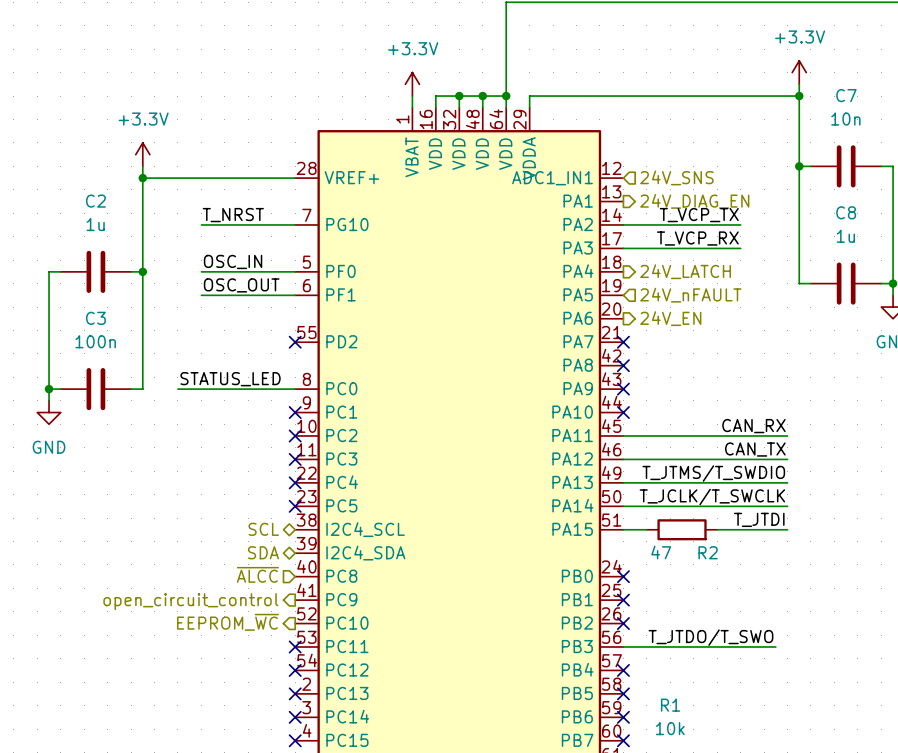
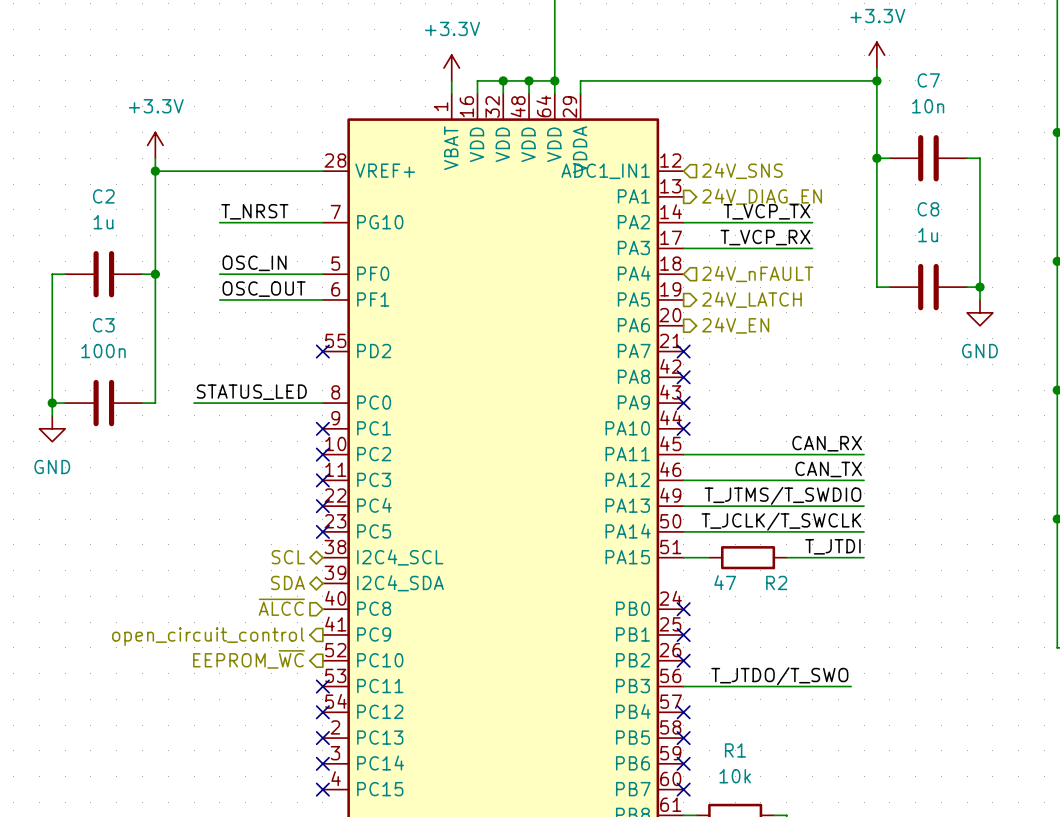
hierarchical label shape: output (685, 271) -> input (757, 274)
hierarchical label: 24V_LATCH (685, 271) -> 24V_nFAULT (757, 274)
hierarchical label shape: input (690, 295) -> output (751, 299)
hierarchical label: 24V_nFAULT (690, 295) -> 24V_LATCH (751, 299)

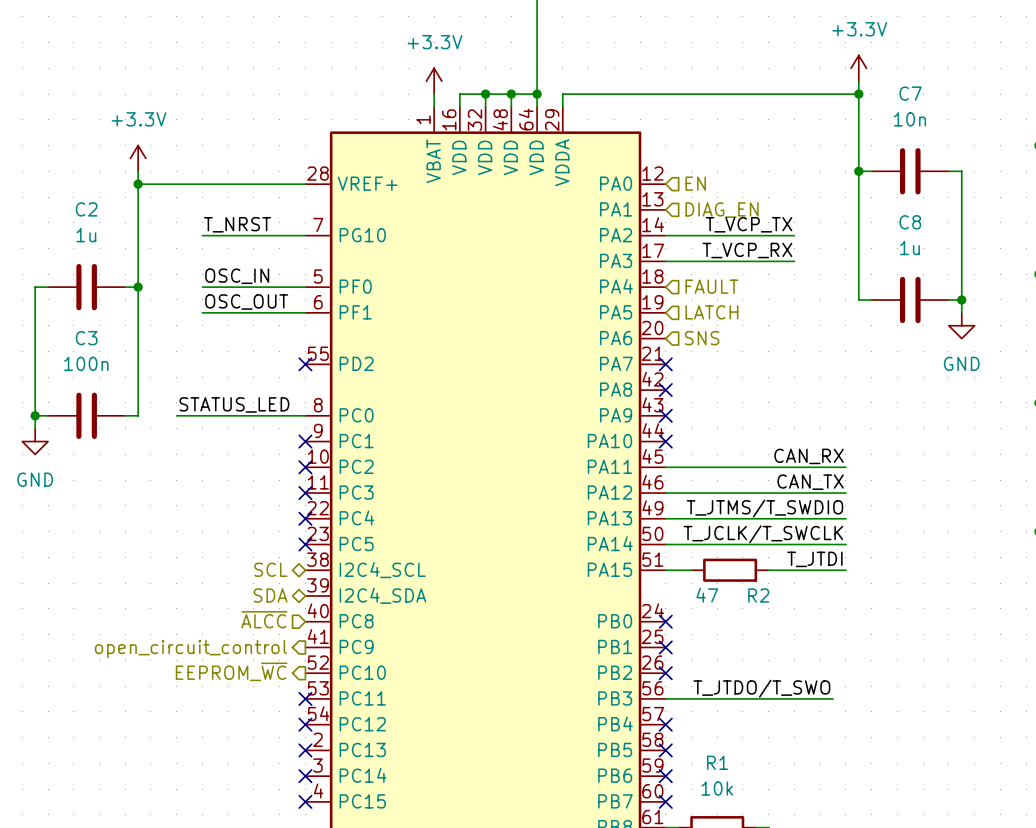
hierarchical label: 24V_SNS (742, 170) -> EN (695, 183)
part pin name: ADC1_IN1 (605, 171) -> PA0 (616, 183)
hierarchical label shape: output (762, 196) -> input (722, 210)
hierarchical label: 24V_DIAG_EN (762, 196) -> DIAG_EN (722, 210)
hierarchical label: 24V_nFAULT (757, 274) -> FAULT (711, 286)
hierarchical label shape: output (751, 299) -> input (711, 312)
hierarchical label: 24V_LATCH (751, 299) -> LATCH (711, 312)
hierarchical label shape: output (735, 325) -> input (702, 338)
hierarchical label: 24V_EN (735, 325) -> SNS (702, 338)

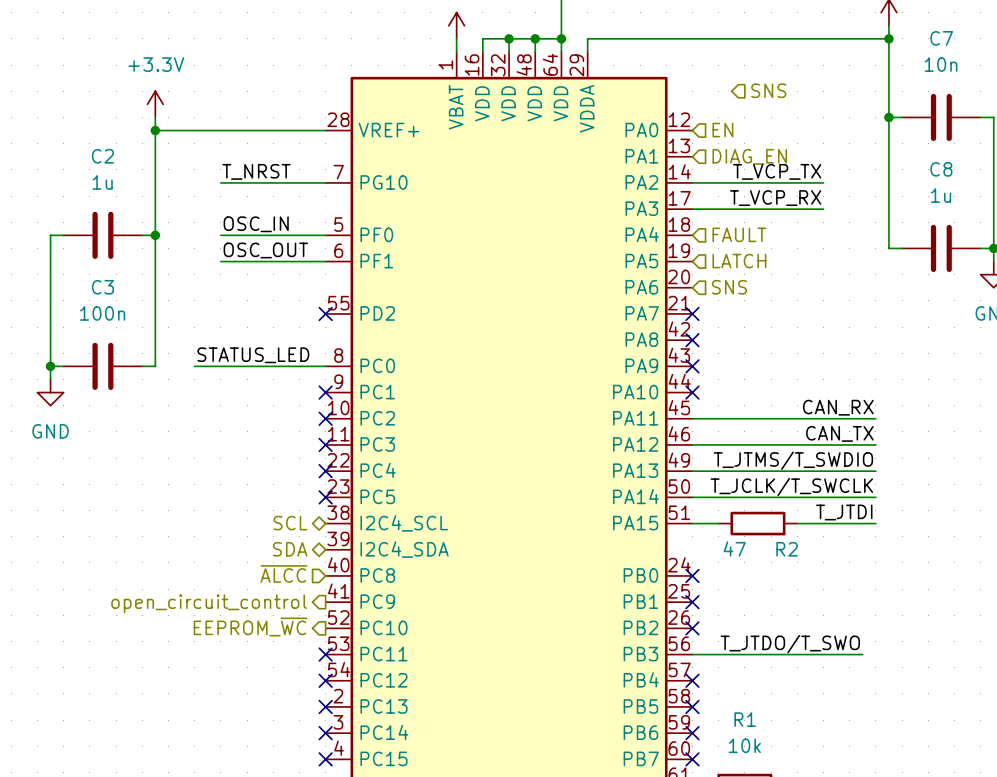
hierarchical label: none -> SNS (768, 90)

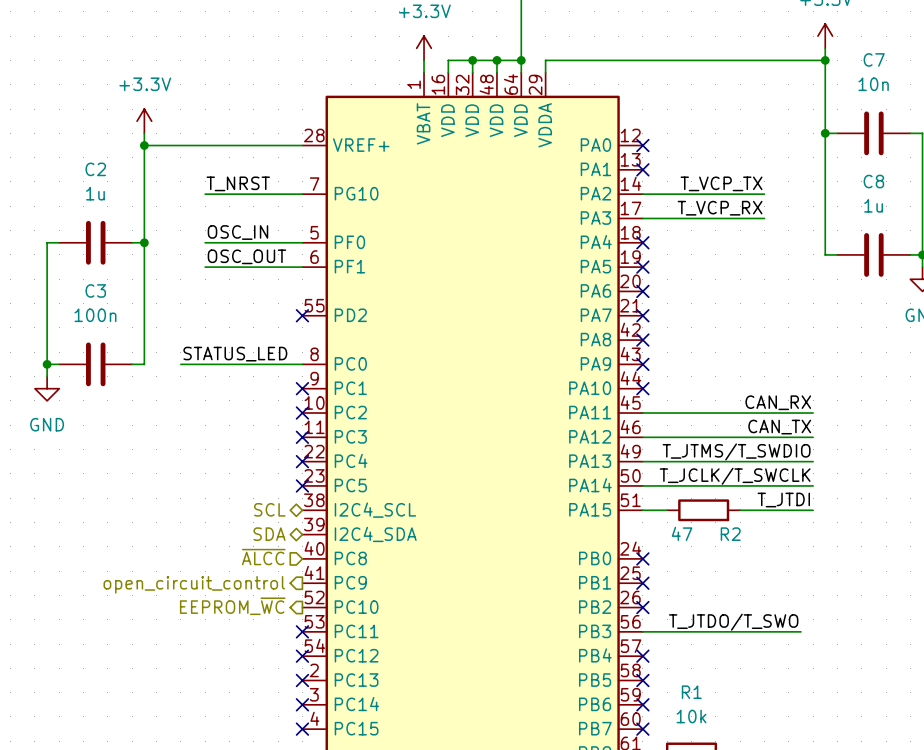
hierarchical label: SNS (768, 90) -> none
no-connect mark: none -> (642, 145)
hierarchical label: EN (722, 130) -> none
no-connect mark: none -> (642, 169)
hierarchical label: DIAG_EN (749, 156) -> none
hierarchical label: FAULT (739, 234) -> none
no-connect mark: none -> (642, 242)
no-connect mark: none -> (642, 267)
hierarchical label: LATCH (739, 261) -> none
no-connect mark: none -> (642, 291)
hierarchical label: SNS (729, 287) -> none

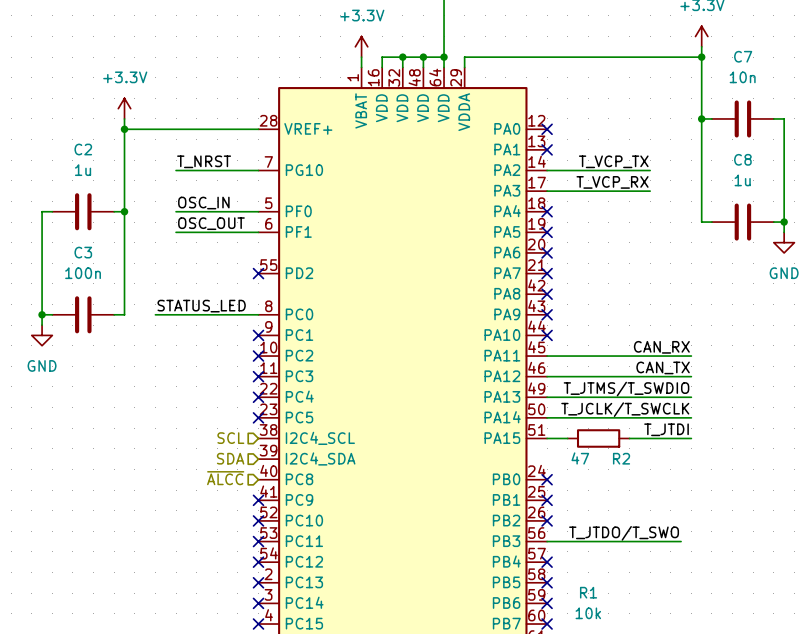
hierarchical label shape: bidirectional (269, 509) -> input (230, 438)
hierarchical label shape: bidirectional (269, 534) -> input (230, 458)
no-connect mark: none -> (258, 500)
hierarchical label: open_circuit_control (194, 584) -> none
hierarchical label: EEPROM_~{WC} (232, 606) -> none
no-connect mark: none -> (258, 520)

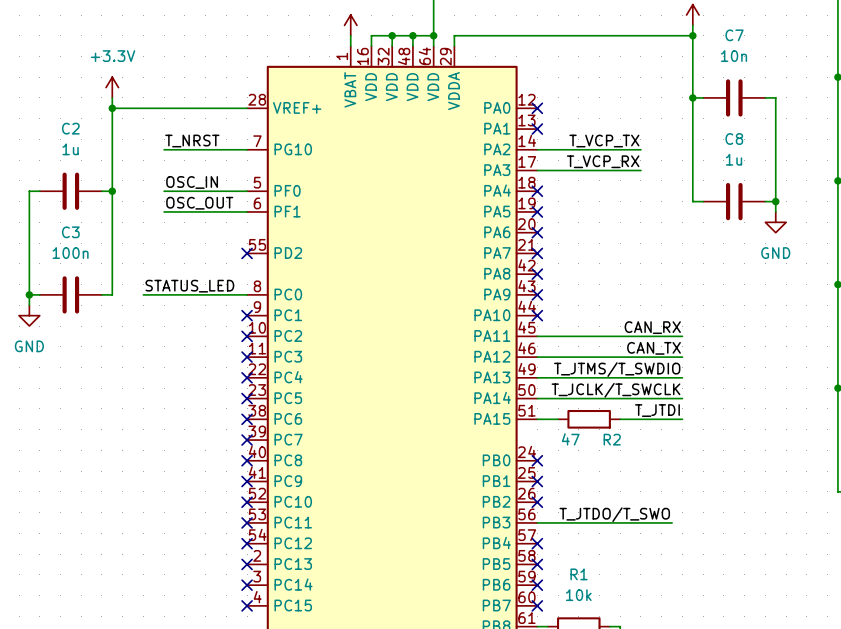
hierarchical label: SCL (230, 438) -> none
no-connect mark: none -> (247, 419)
part pin name: I2C4_SCL (320, 438) -> PC6 (288, 418)
hierarchical label: SDA (230, 458) -> none
part pin name: I2C4_SDA (320, 458) -> PC7 (288, 439)
no-connect mark: none -> (247, 440)
hierarchical label: ~{ALCC} (225, 478) -> none
no-connect mark: none -> (247, 460)

